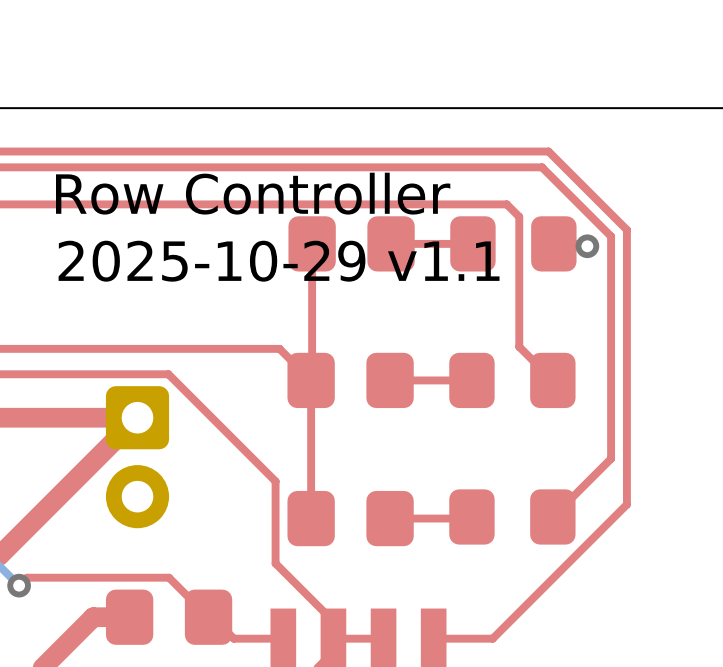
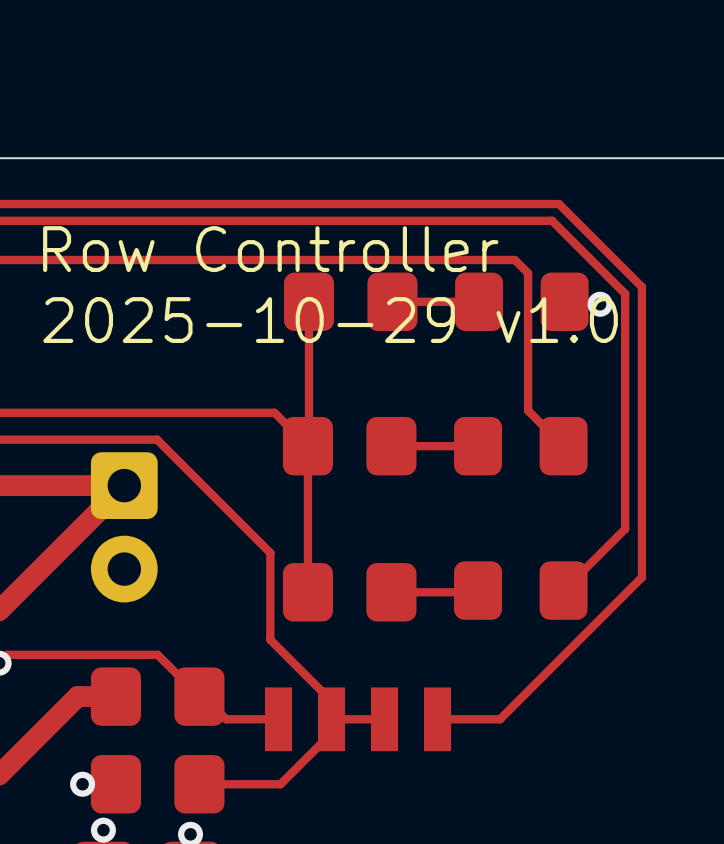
text: 2025-10-29 v1.1 (279, 261) -> 2025-10-29 v1.0 (330, 320)

